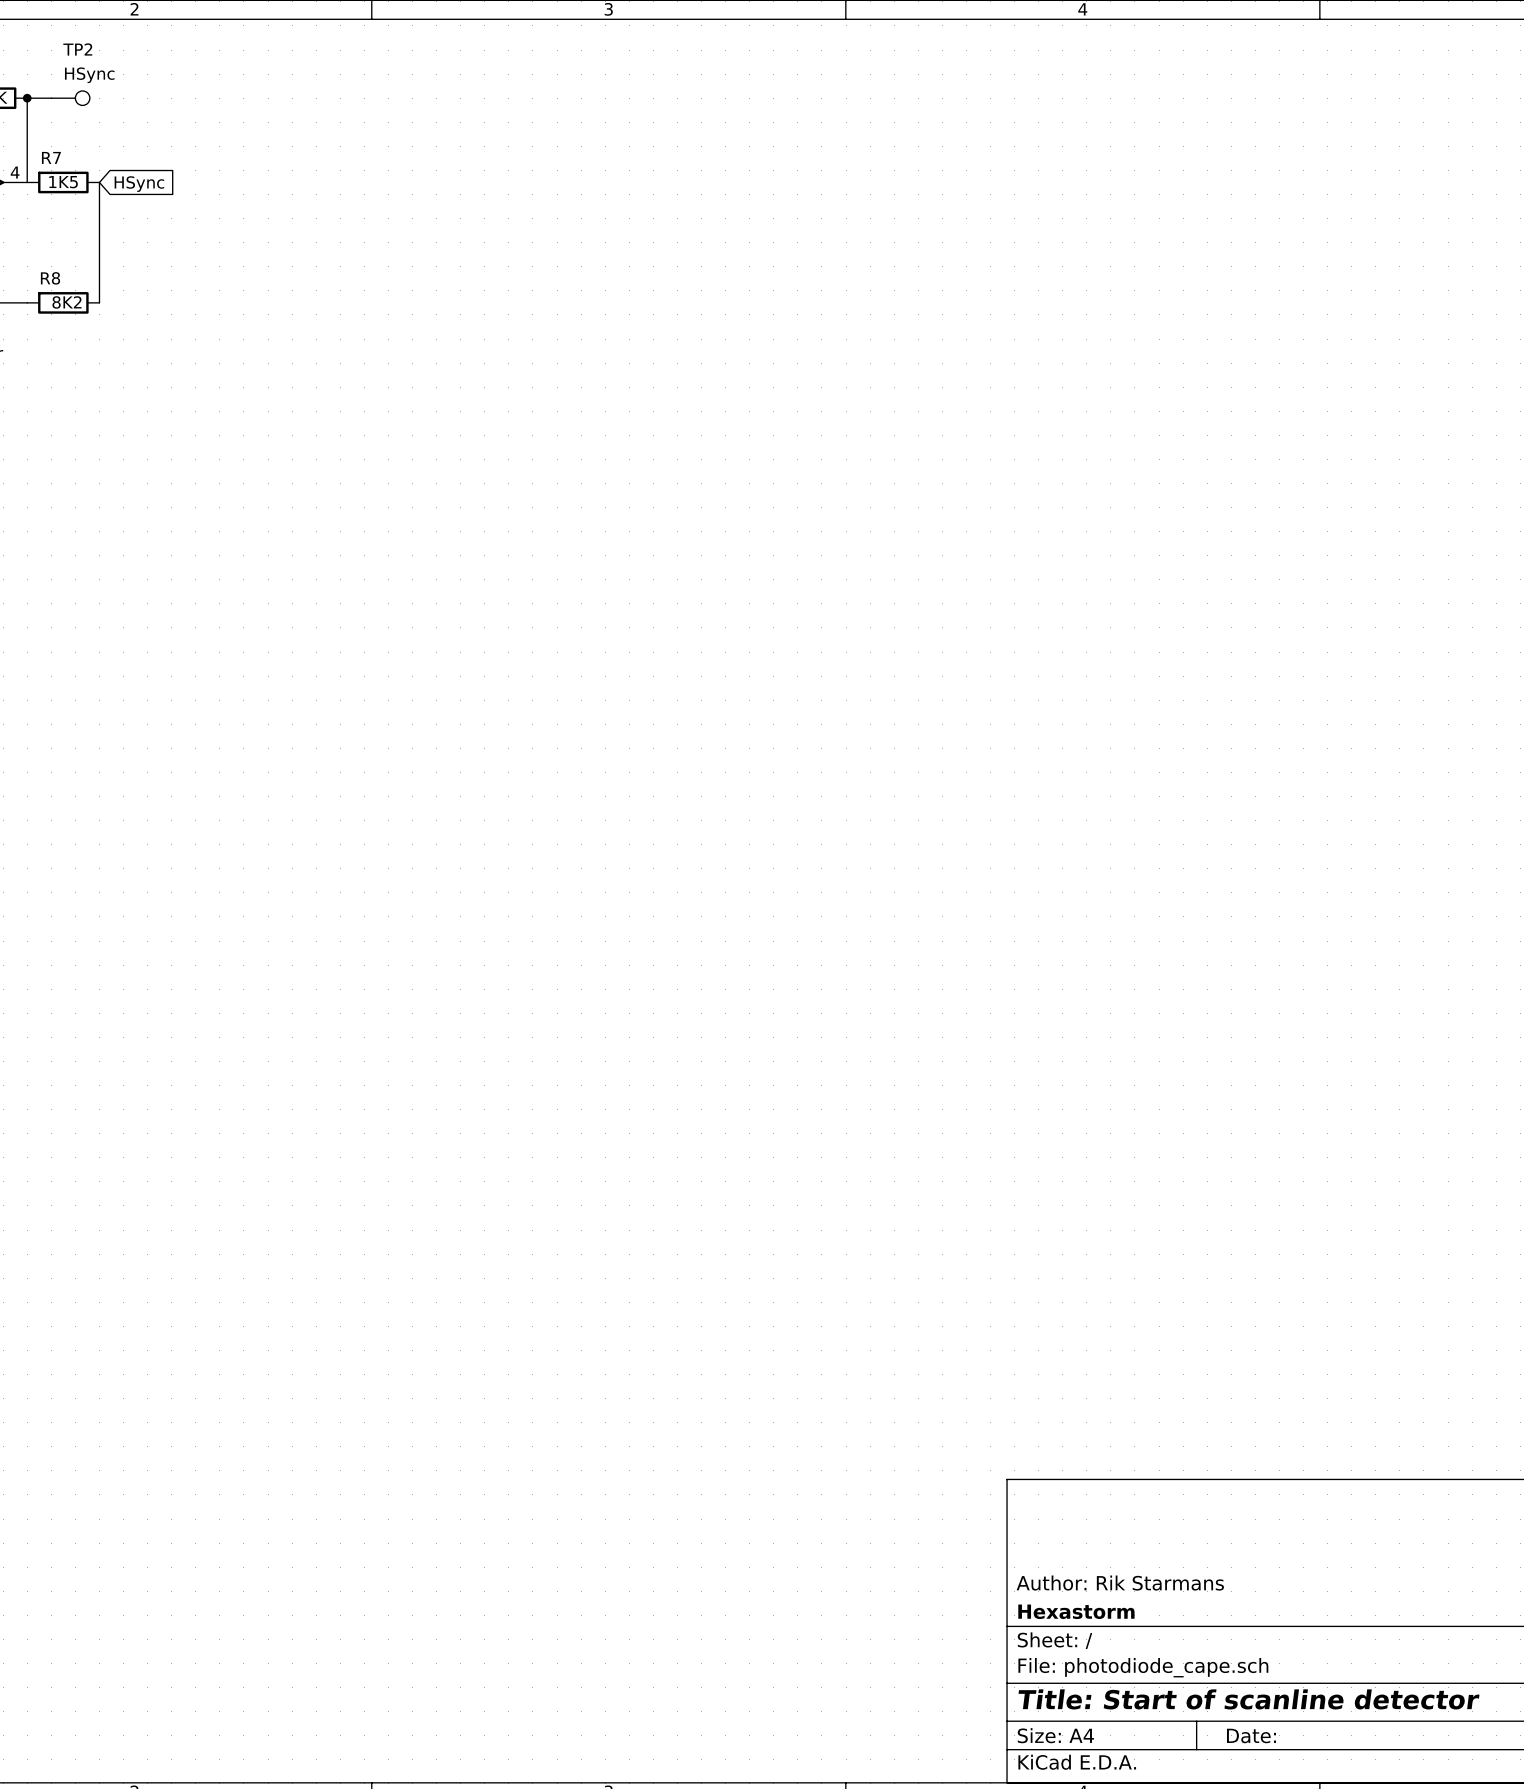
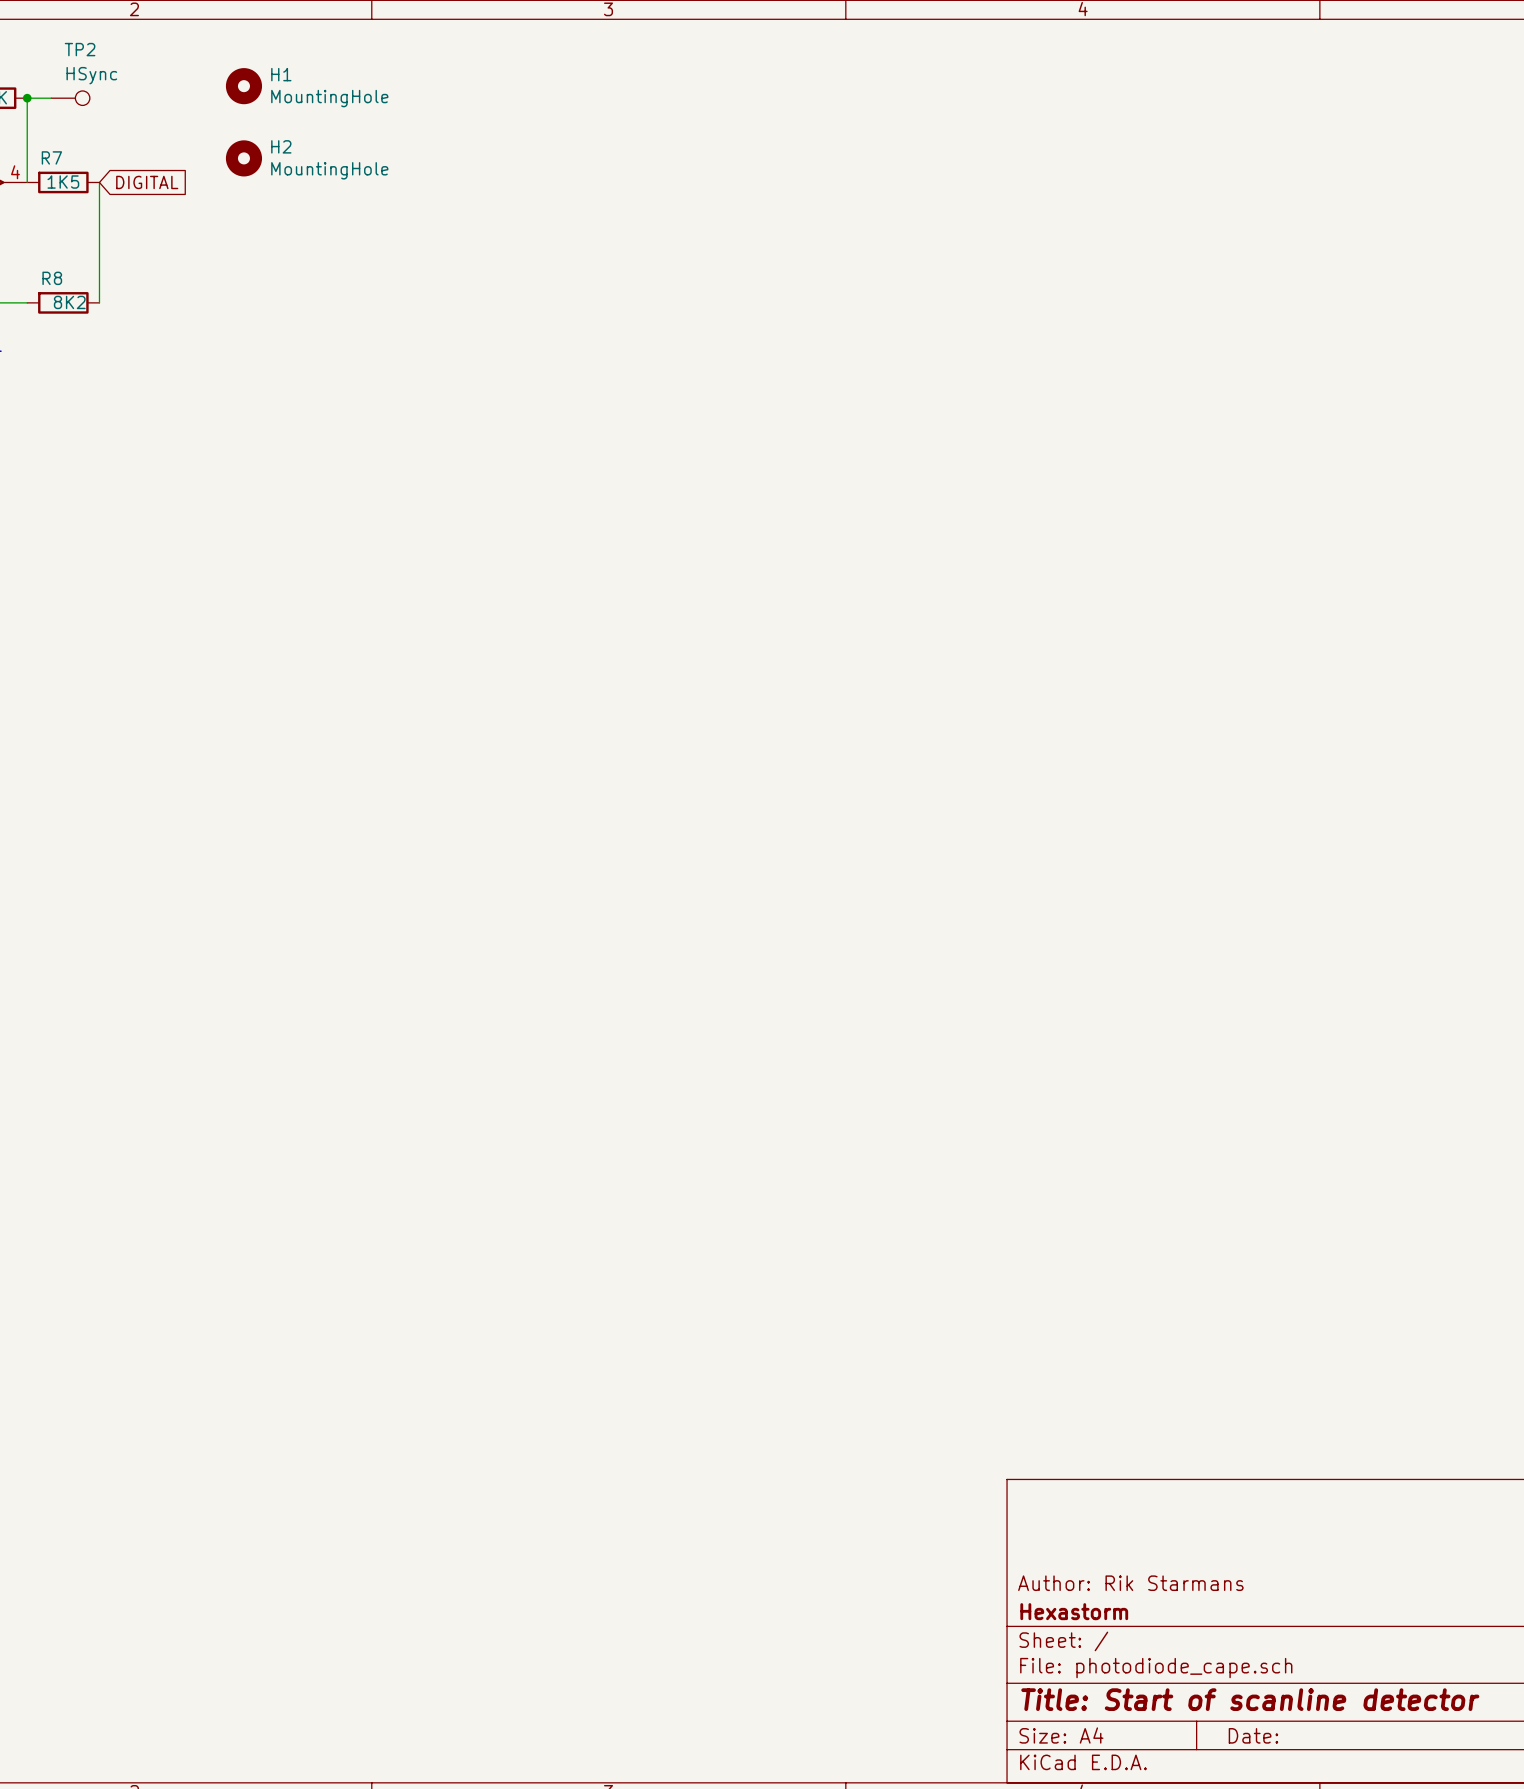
H1: none -> MountingHole (243, 86)
H2: none -> MountingHole (243, 158)
global label: HSync (139, 184) -> DIGITAL (147, 182)

